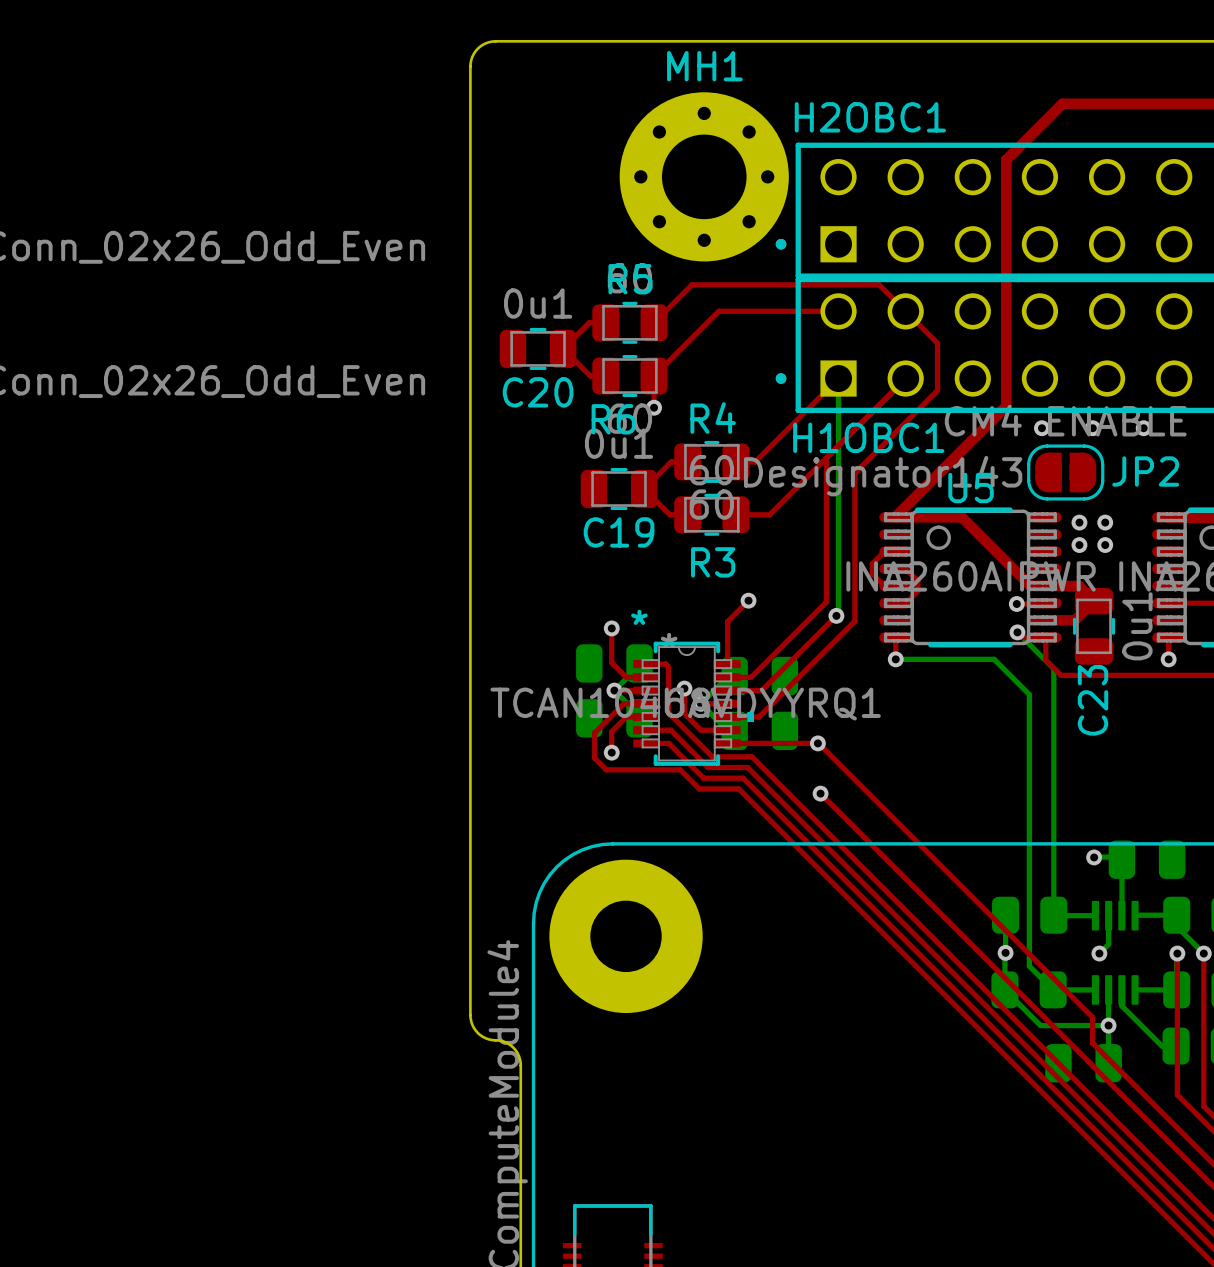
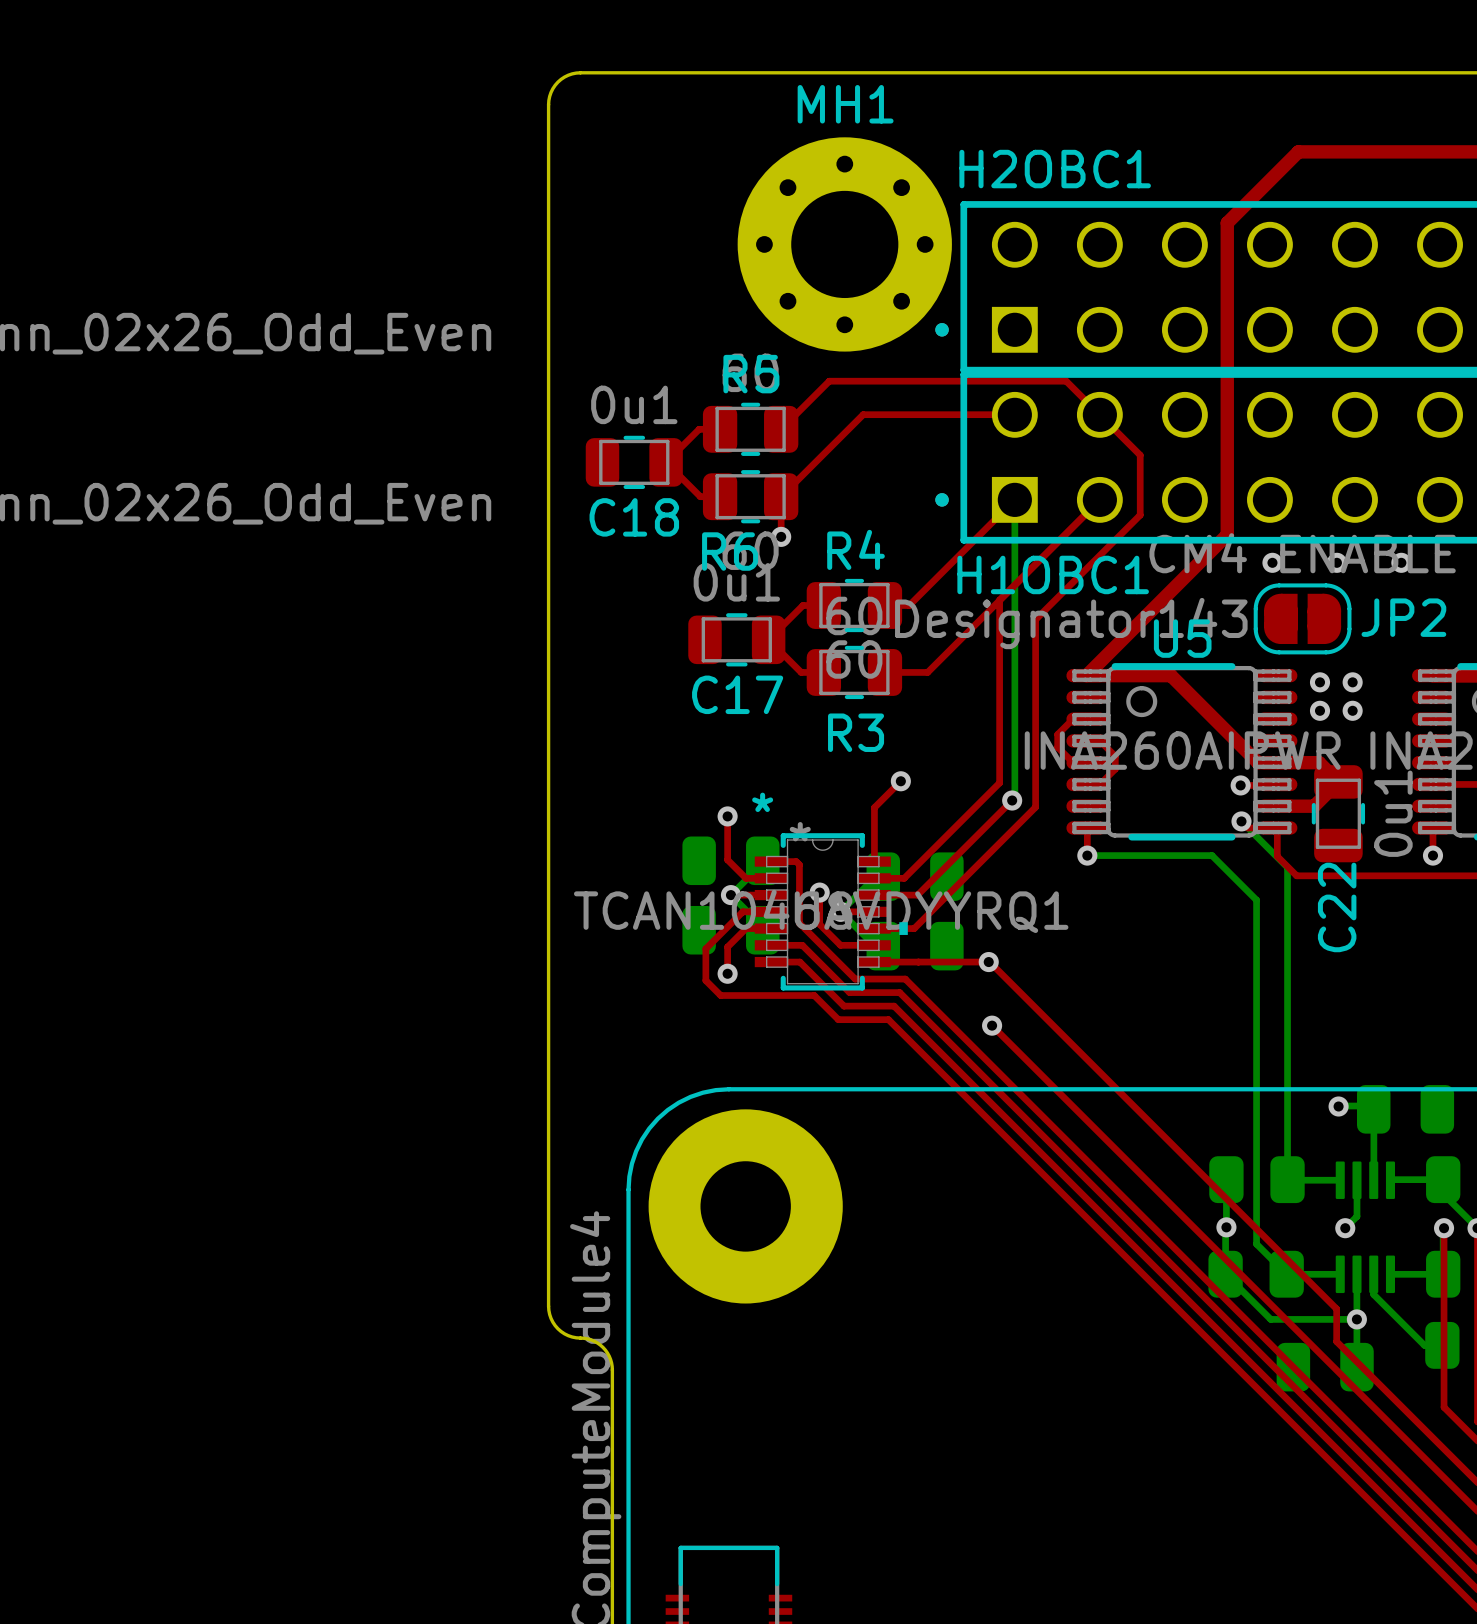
C20 name: C20 (538, 392) -> C18 (634, 517)
C19 name: C19 (619, 532) -> C17 (737, 694)
C23 name: C23 (1093, 700) -> C22 (1337, 907)

